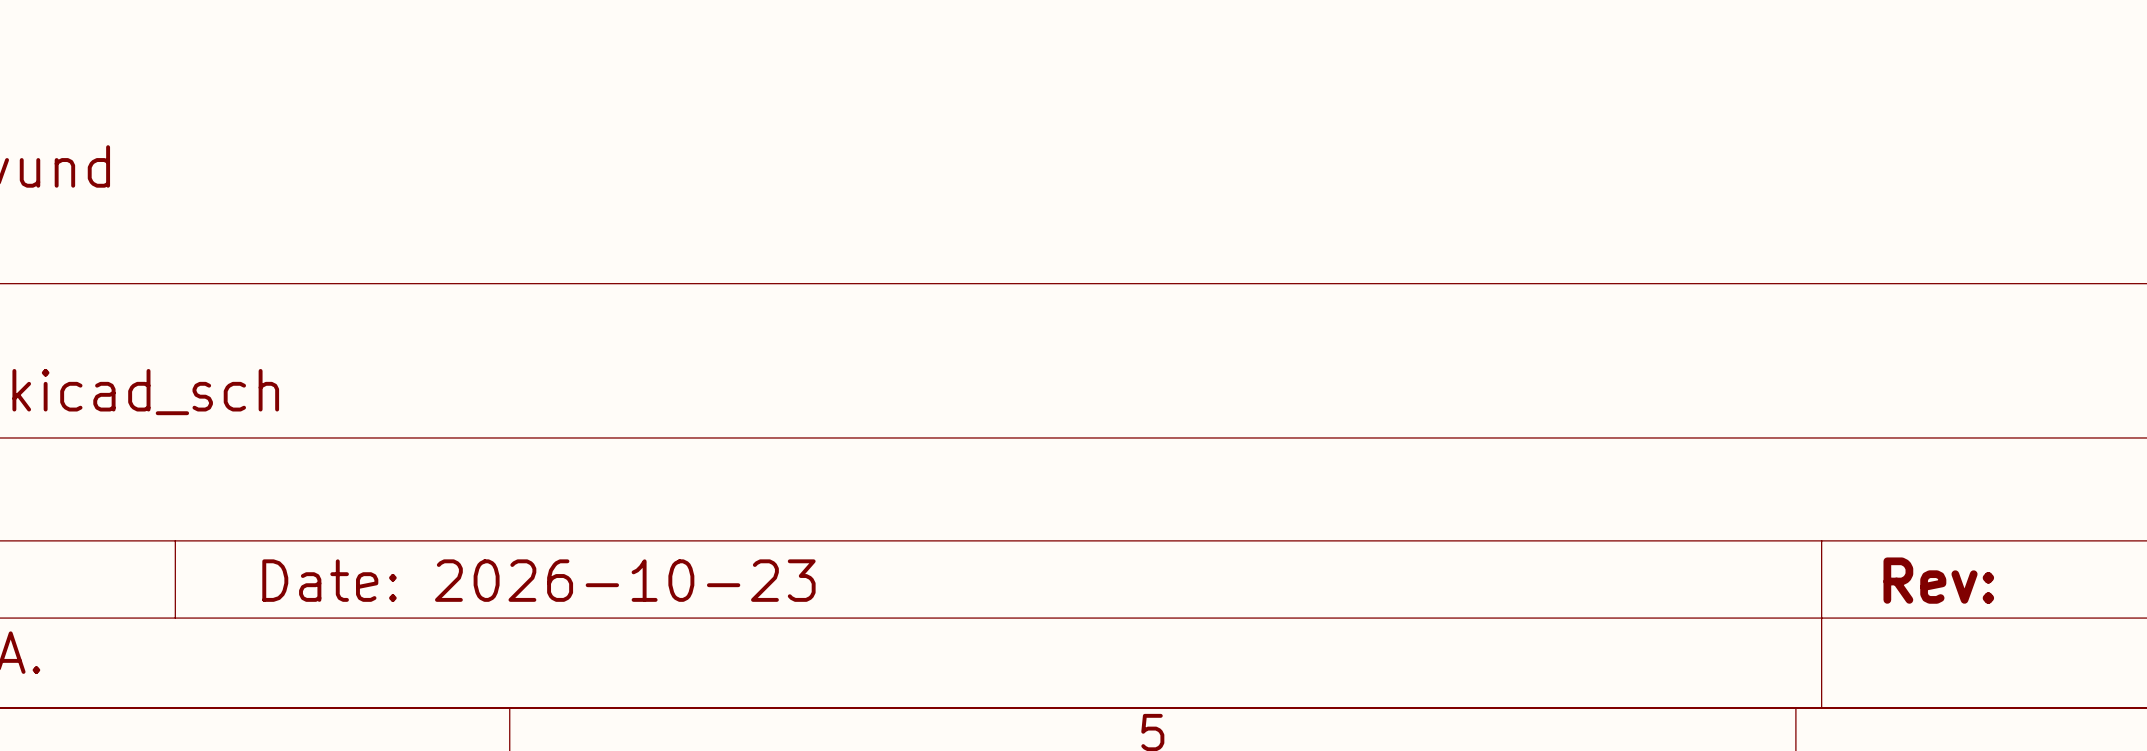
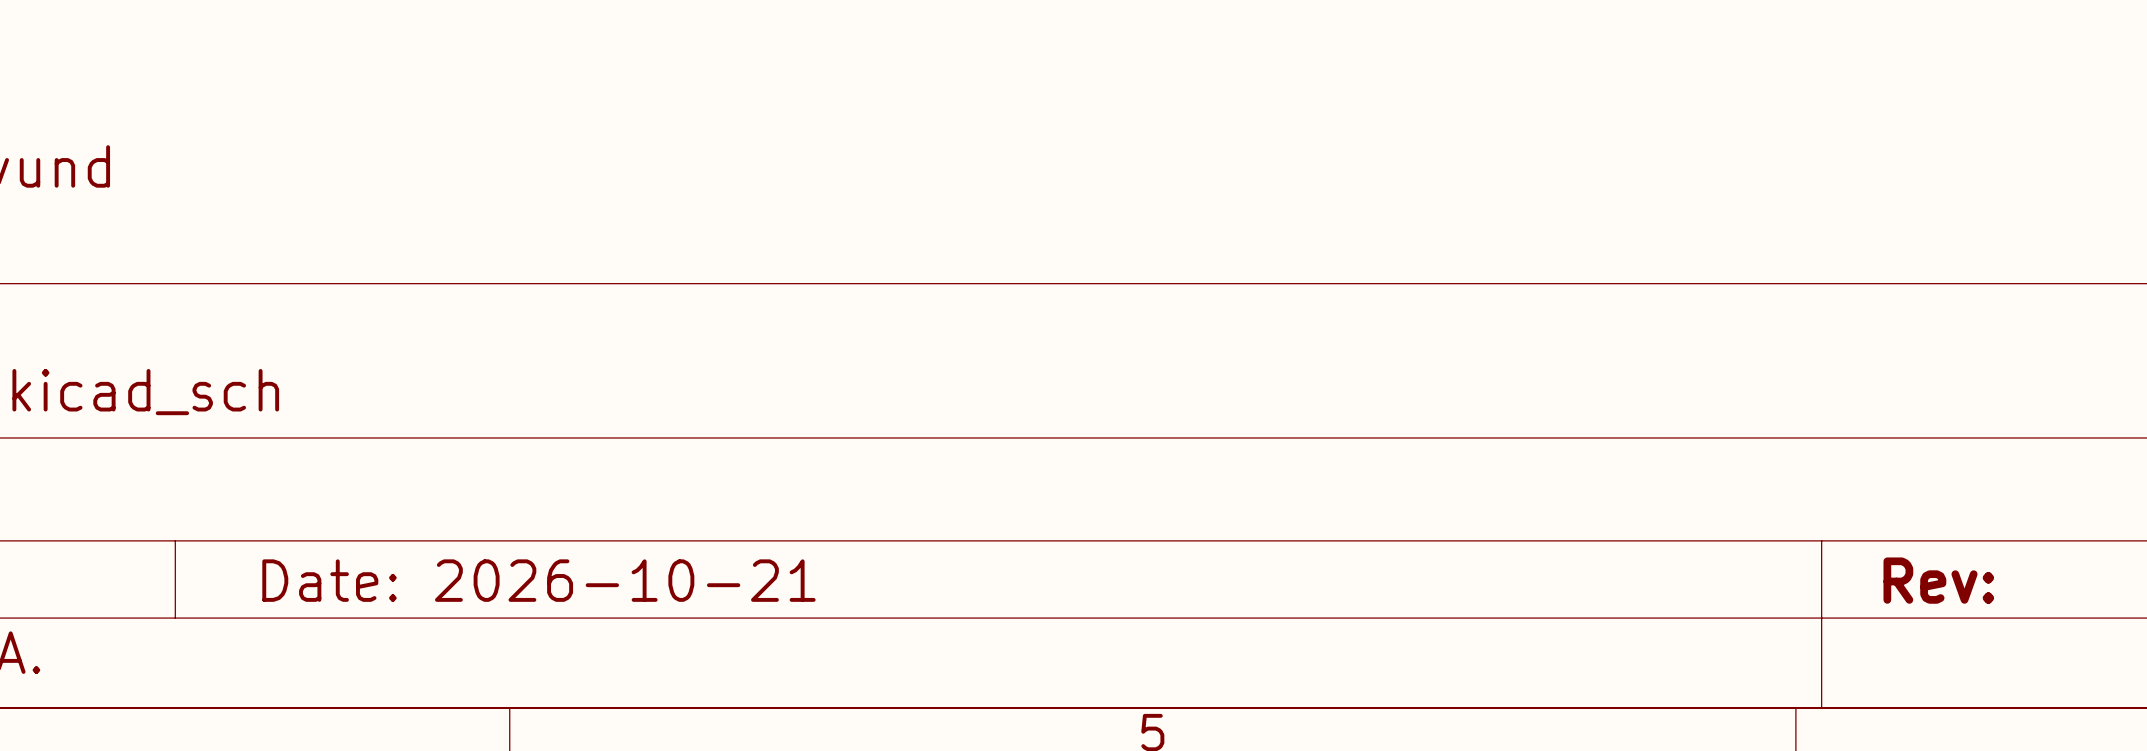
title block: Date: 2026-10-23 (538, 580) -> Date: 2026-10-21 (538, 580)

